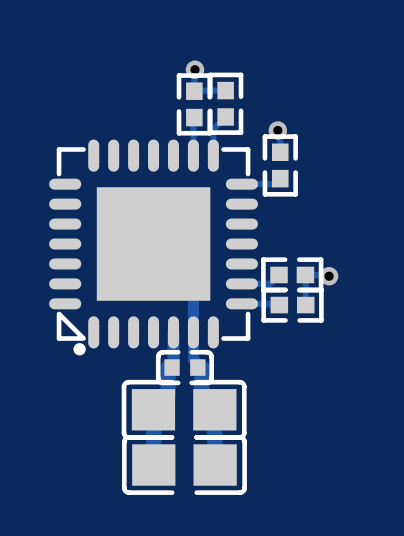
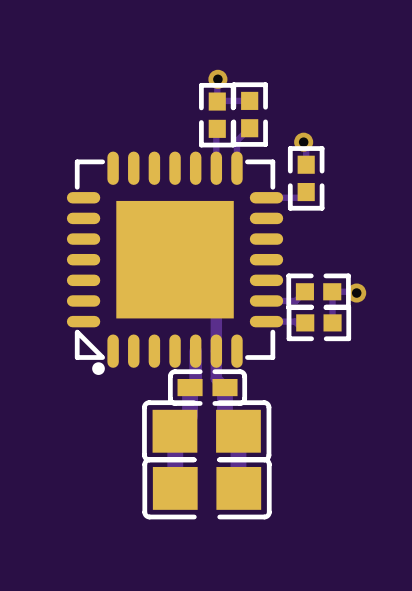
part footprint: [155, 349, 214, 386] -> [167, 369, 248, 406]

